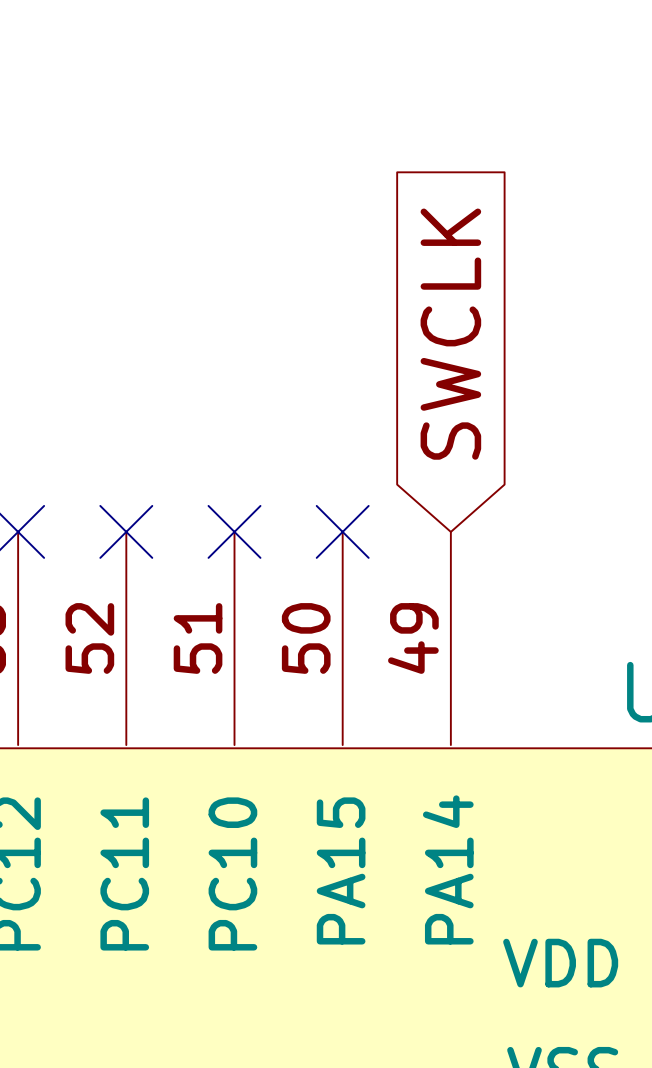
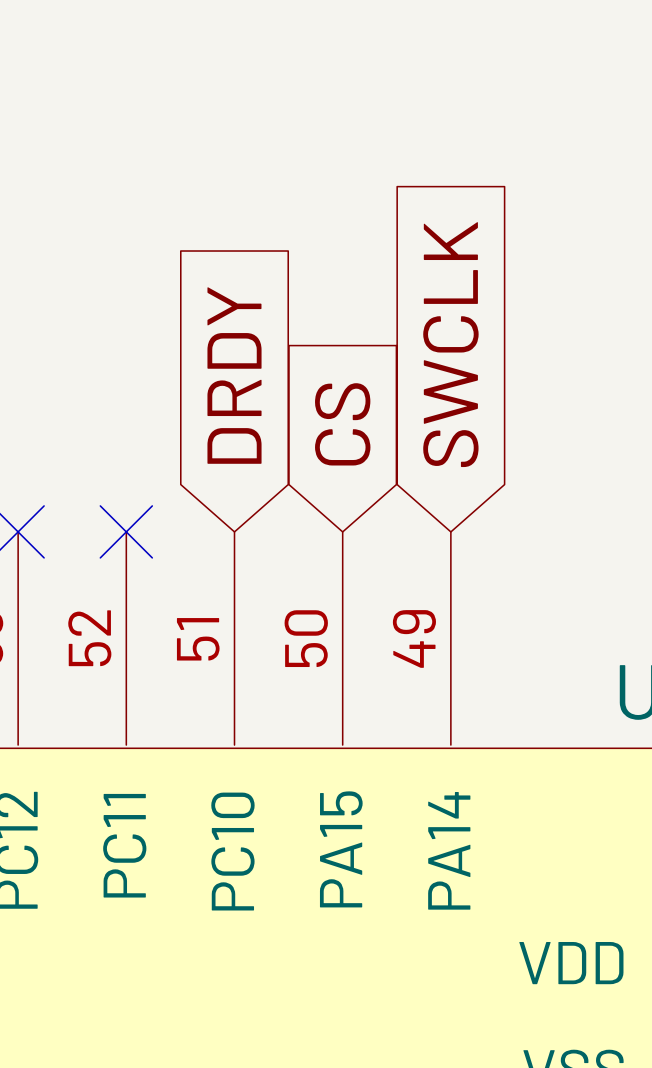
global label: none -> DRDY (234, 375)
global label: none -> CS (342, 424)
no-connect mark: (234, 531) -> none
no-connect mark: (342, 531) -> none

